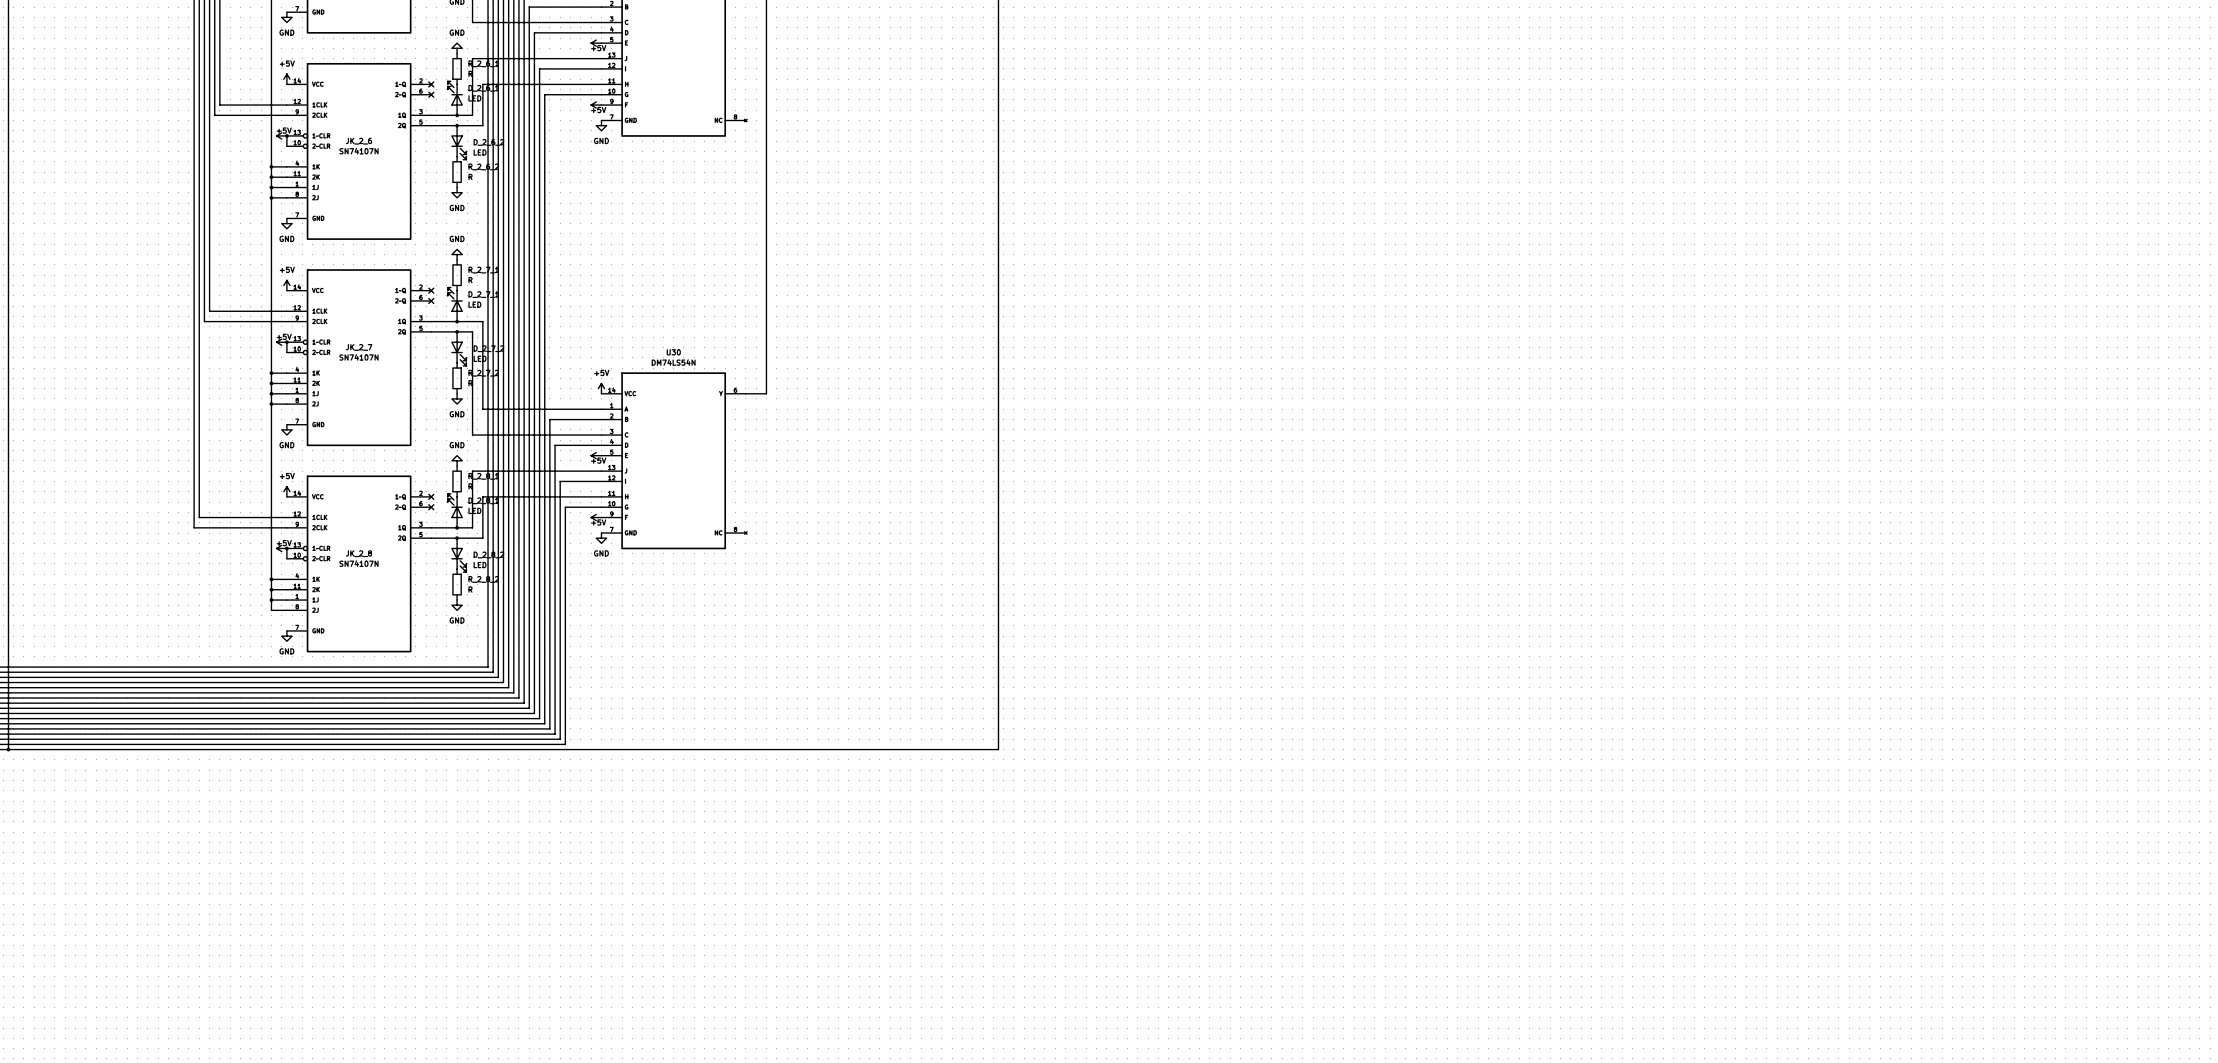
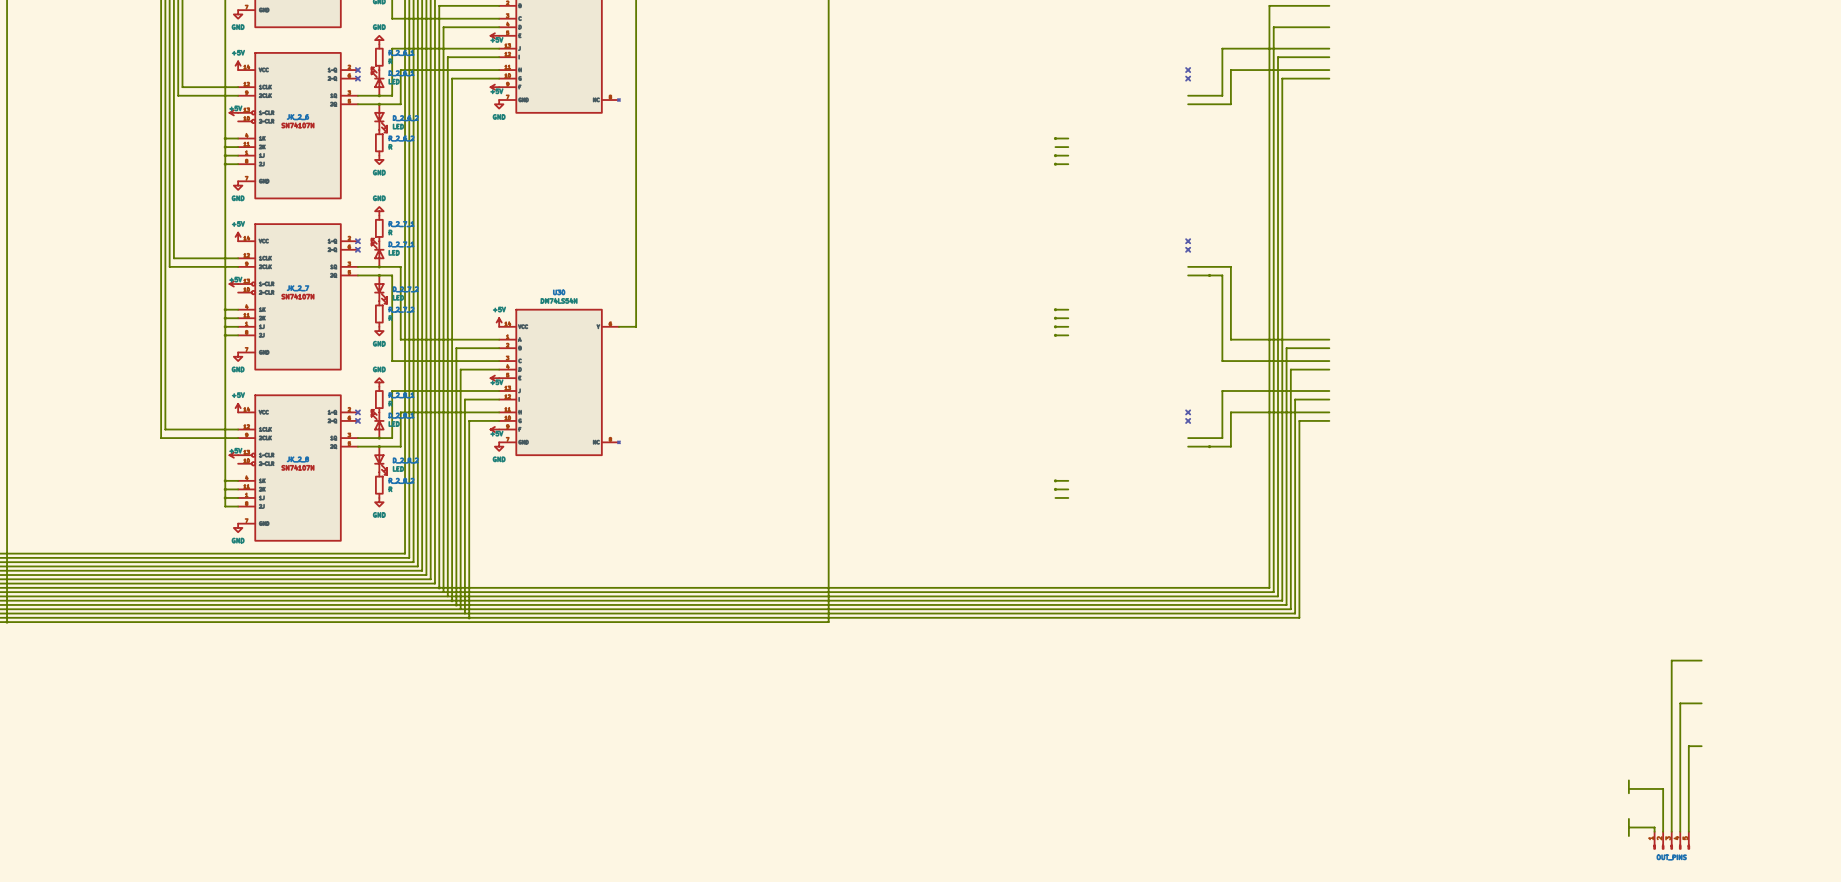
wire: none -> (1329, 5) (1269, 5) (1269, 587) (439, 587)
wire: none -> (1329, 27) (1273, 27) (1273, 592) (443, 592)
wire: none -> (1329, 48) (1222, 48) (1222, 95) (1188, 95)
wire: none -> (1329, 57) (1278, 57) (1278, 596) (447, 596)
no-connect mark: none -> (1188, 70)
wire: none -> (1329, 70) (1230, 70) (1230, 104) (1188, 104)
no-connect mark: none -> (1188, 78)
wire: none -> (1329, 78) (1282, 78) (1282, 600) (452, 600)
wire: (286, 135) (286, 146) -> none
junction: (286, 135) -> none
wire: none -> (1055, 138) (1068, 138)
junction: none -> (1055, 138)
wire: none -> (1055, 147) (1068, 147)
wire: none -> (1055, 155) (1068, 155)
junction: none -> (1055, 155)
wire: none -> (1055, 164) (1068, 164)
junction: none -> (1055, 164)
no-connect mark: none -> (1188, 241)
no-connect mark: none -> (1188, 249)
wire: none -> (1188, 266) (1230, 266) (1230, 339) (1329, 339)
wire: none -> (1188, 275) (1222, 275) (1222, 361) (1329, 361)
junction: none -> (1209, 275)
wire: (286, 342) (286, 352) -> none
junction: (286, 342) -> none
wire: none -> (1055, 309) (1068, 309)
junction: none -> (1055, 309)
wire: none -> (1055, 318) (1068, 318)
junction: none -> (1055, 318)
wire: none -> (1055, 326) (1068, 326)
junction: none -> (1055, 326)
wire: none -> (1055, 335) (1068, 335)
junction: none -> (1055, 335)
wire: none -> (1329, 348) (1286, 348) (1286, 604) (456, 604)
wire: none -> (1329, 369) (1290, 369) (1290, 609) (460, 609)
wire: none -> (1329, 391) (1222, 391) (1222, 438) (1188, 438)
wire: none -> (1329, 399) (1295, 399) (1295, 613) (464, 613)
no-connect mark: none -> (1188, 412)
wire: none -> (1329, 412) (1230, 412) (1230, 446) (1188, 446)
no-connect mark: none -> (1188, 420)
wire: none -> (1329, 420) (1299, 420) (1299, 617) (469, 617)
junction: none -> (1209, 446)
wire: (286, 548) (286, 558) -> none
junction: (286, 548) -> none
wire: none -> (1055, 480) (1068, 480)
junction: none -> (1055, 480)
wire: none -> (1055, 489) (1068, 489)
junction: none -> (1055, 489)
wire: none -> (1055, 497) (1068, 497)
wire: none -> (1701, 660) (1671, 660) (1671, 831)
wire: none -> (1701, 703) (1680, 703) (1680, 831)
wire: none -> (1701, 746) (1688, 746) (1688, 831)
wire: none -> (1628, 780) (1628, 793)
wire: none -> (1628, 788) (1663, 788) (1663, 831)
wire: none -> (1628, 818) (1628, 836)
wire: none -> (1628, 827) (1654, 827) (1654, 831)
part: none -> (1671, 840)

